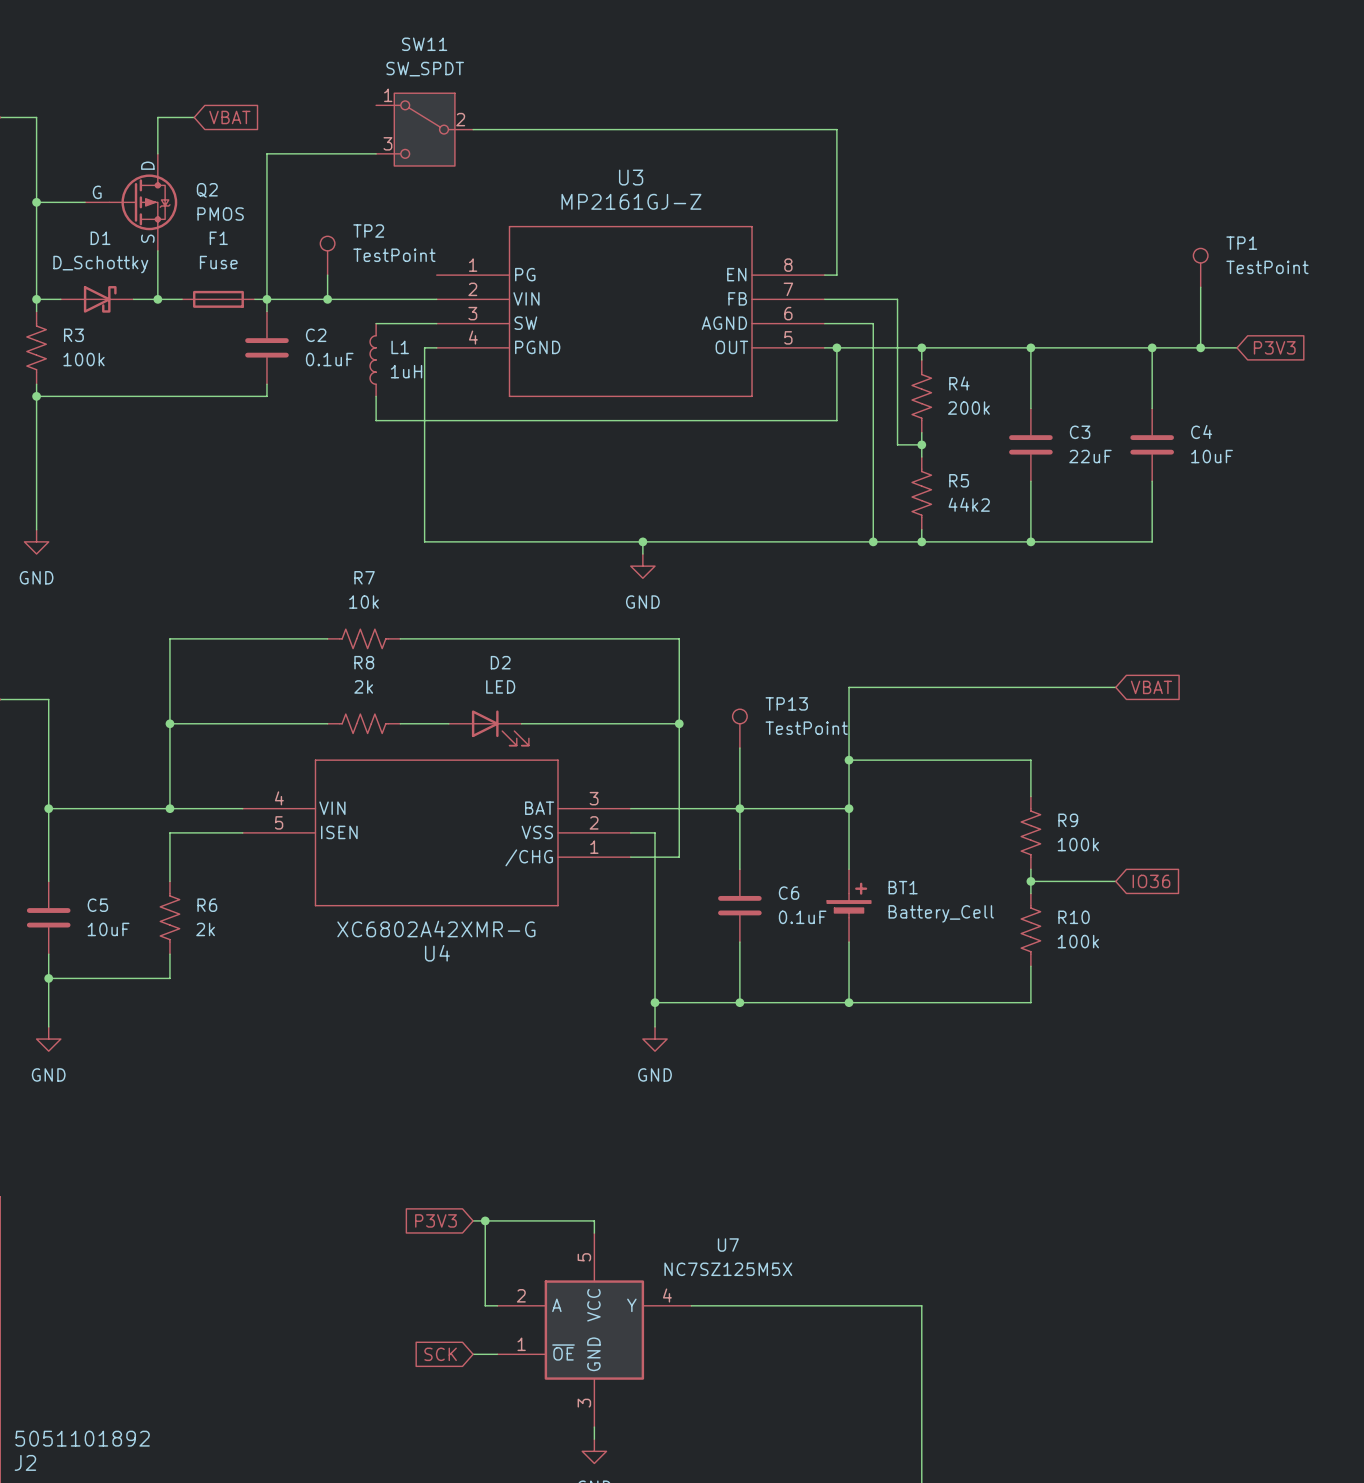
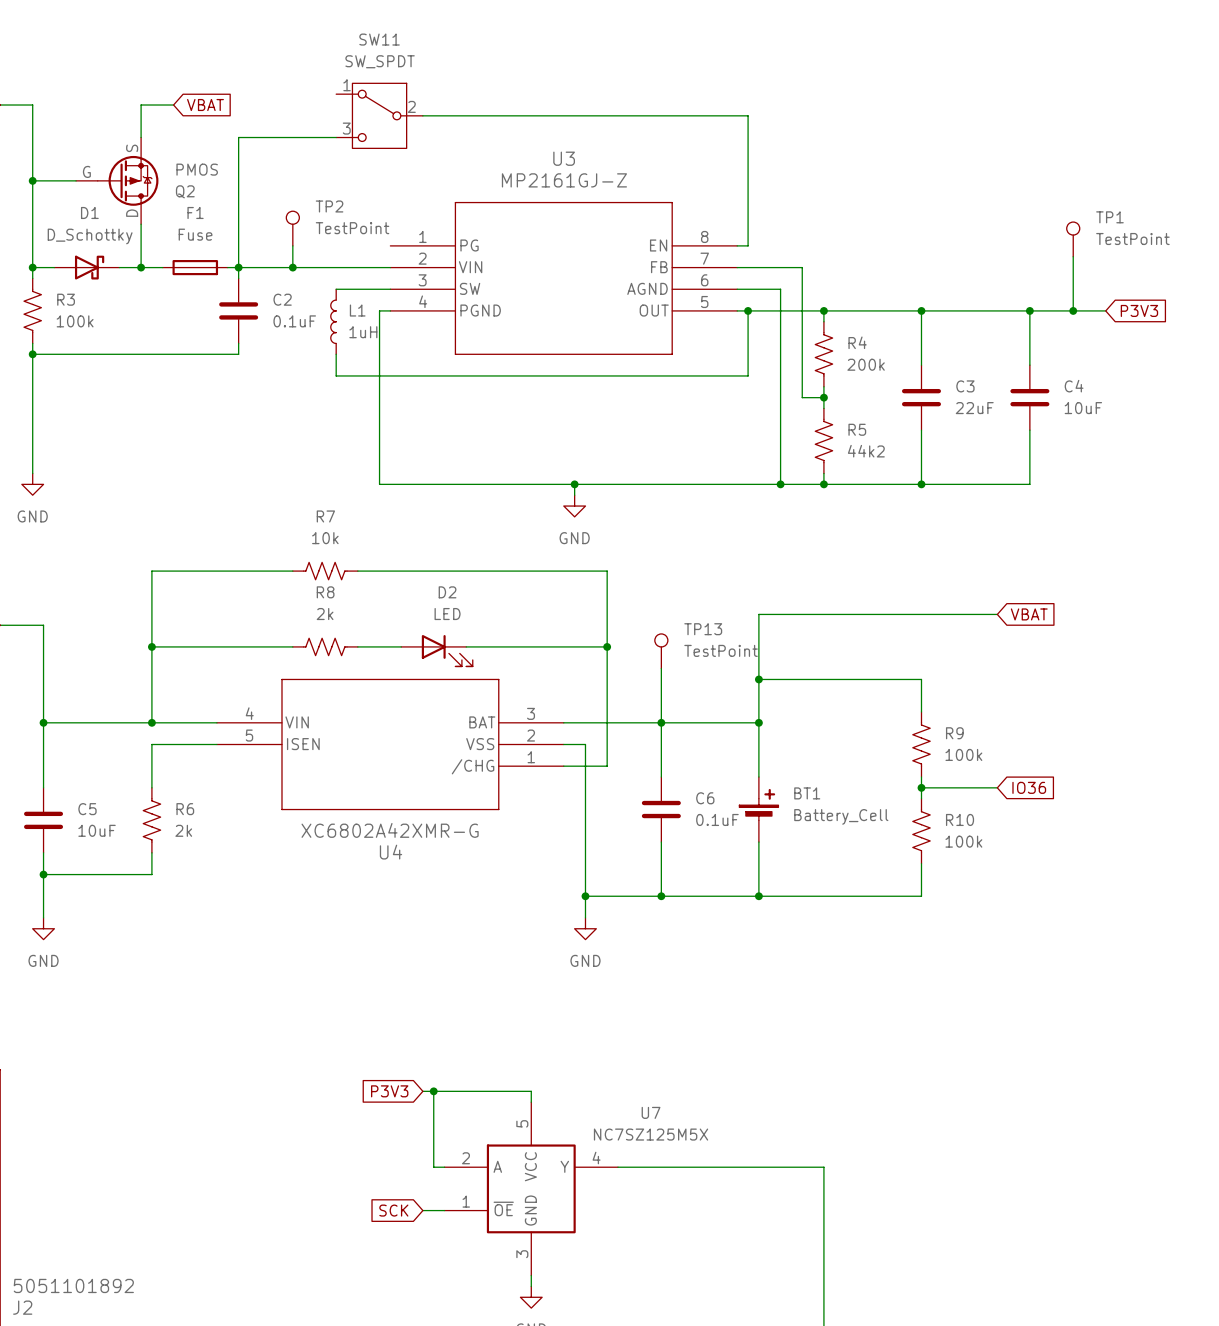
Q2 flip: as is (143, 202) -> up-down (128, 180)

